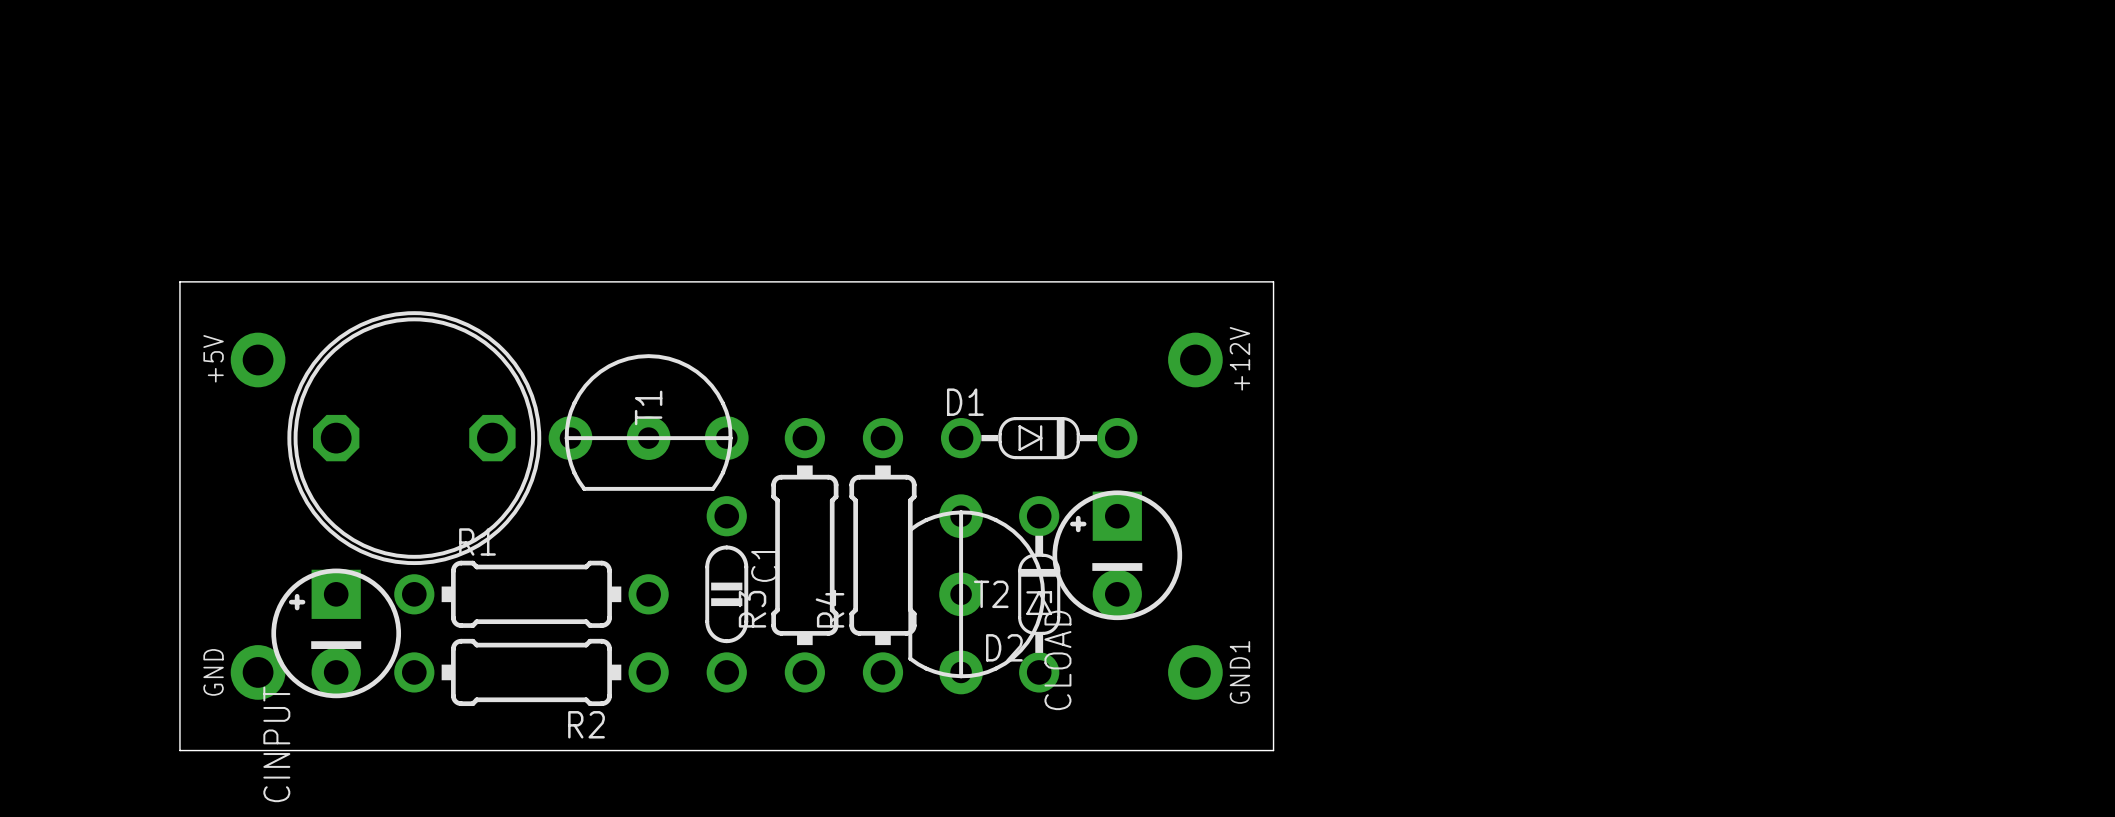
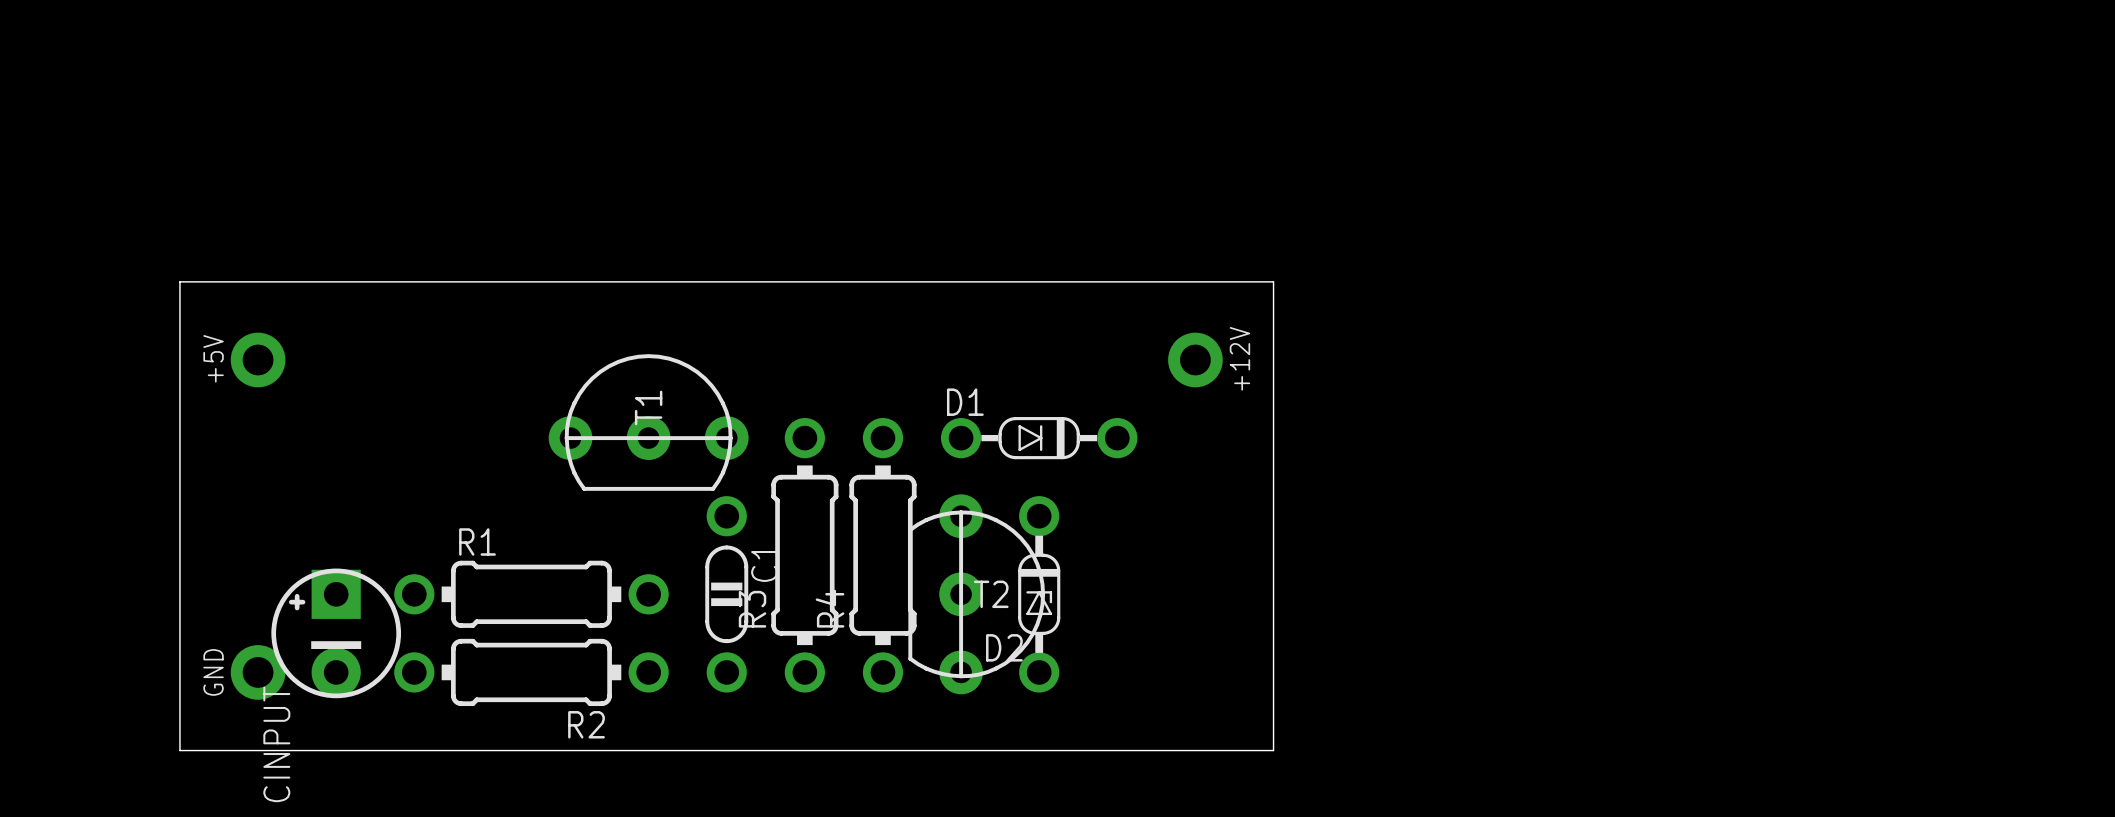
part: (414, 438) -> none
CLOAD: (1117, 555) -> none
GND1: (1195, 672) -> none

